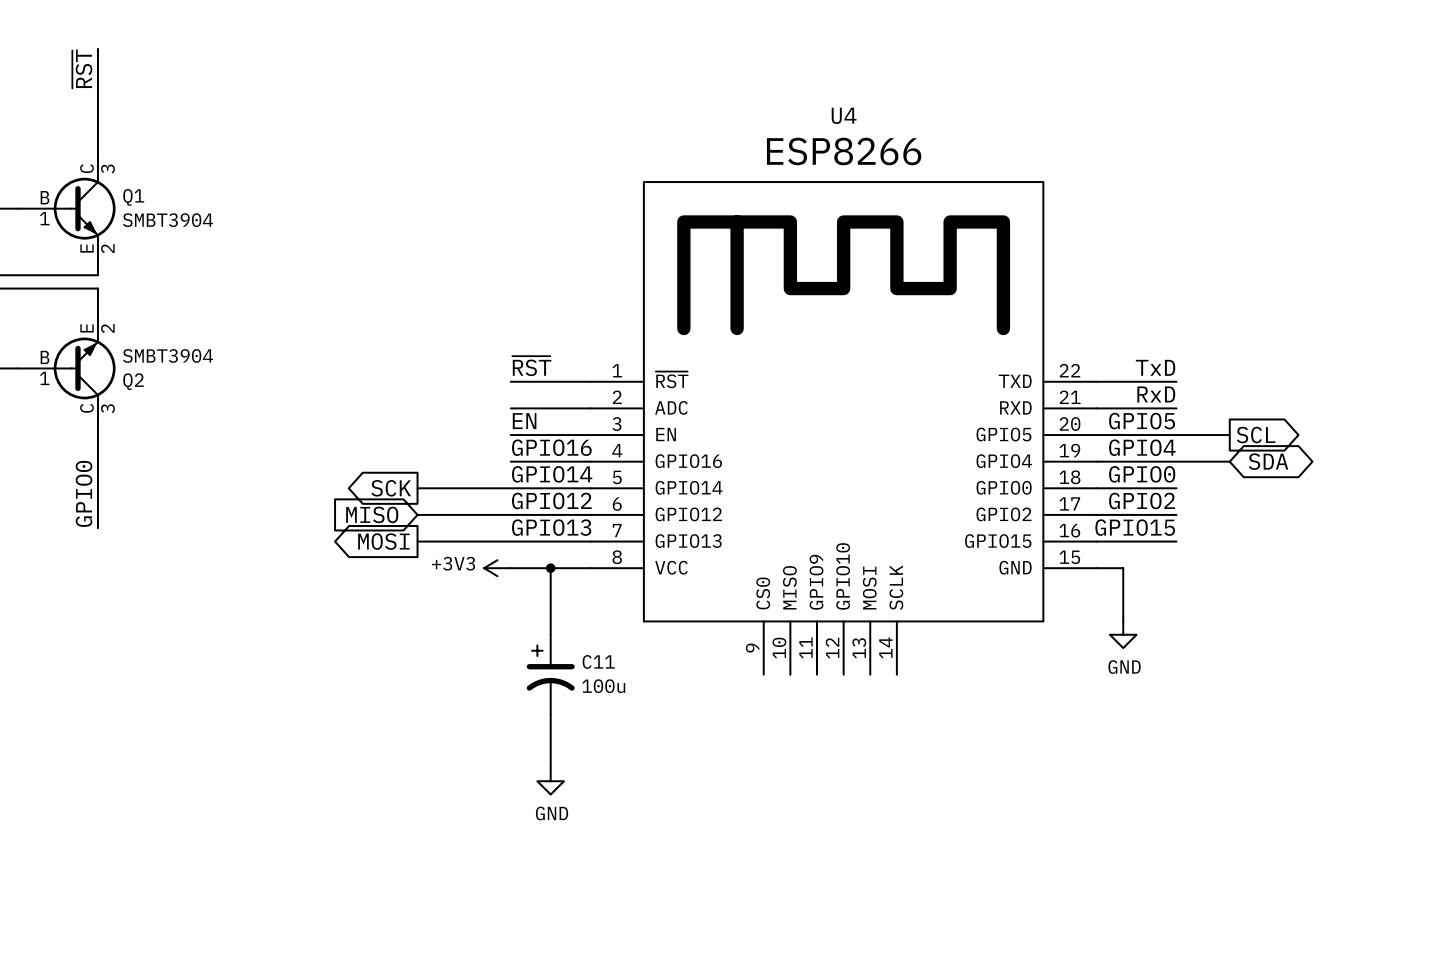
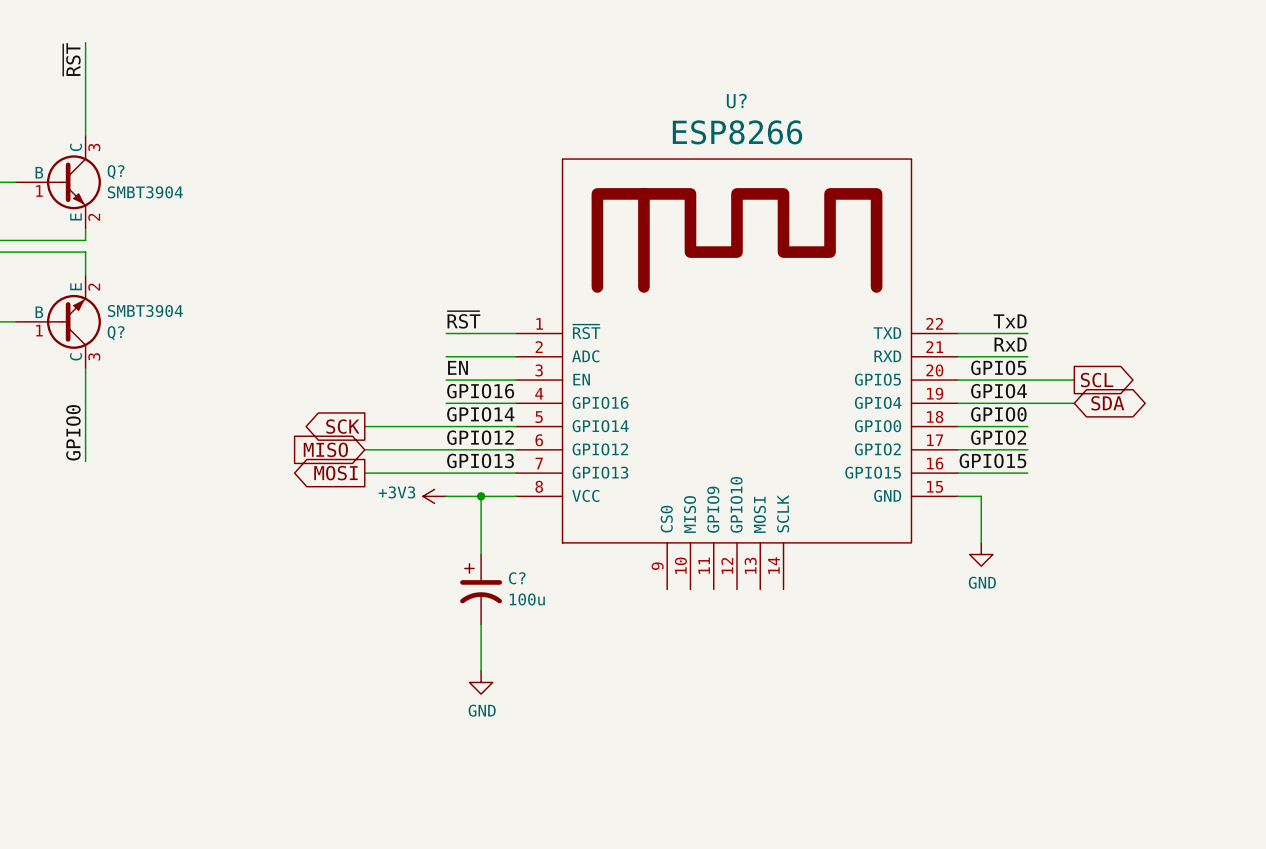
U4 name: U4 (844, 115) -> U? (736, 101)
Q1 name: Q1 (133, 197) -> Q? (116, 172)
Q2 name: Q2 (133, 381) -> Q? (116, 333)
C11 name: C11 (598, 661) -> C? (517, 578)

